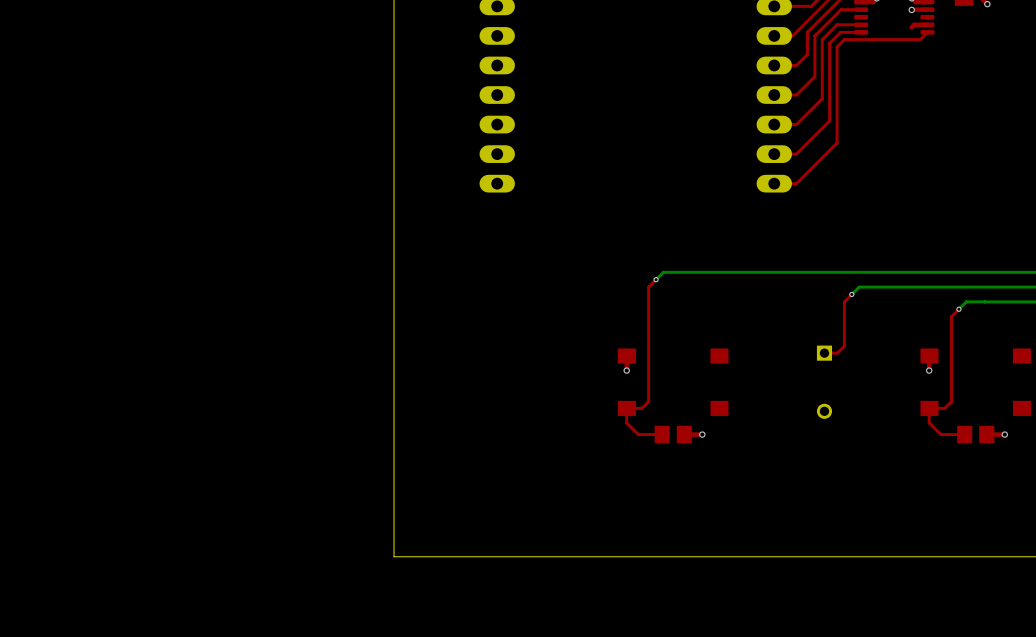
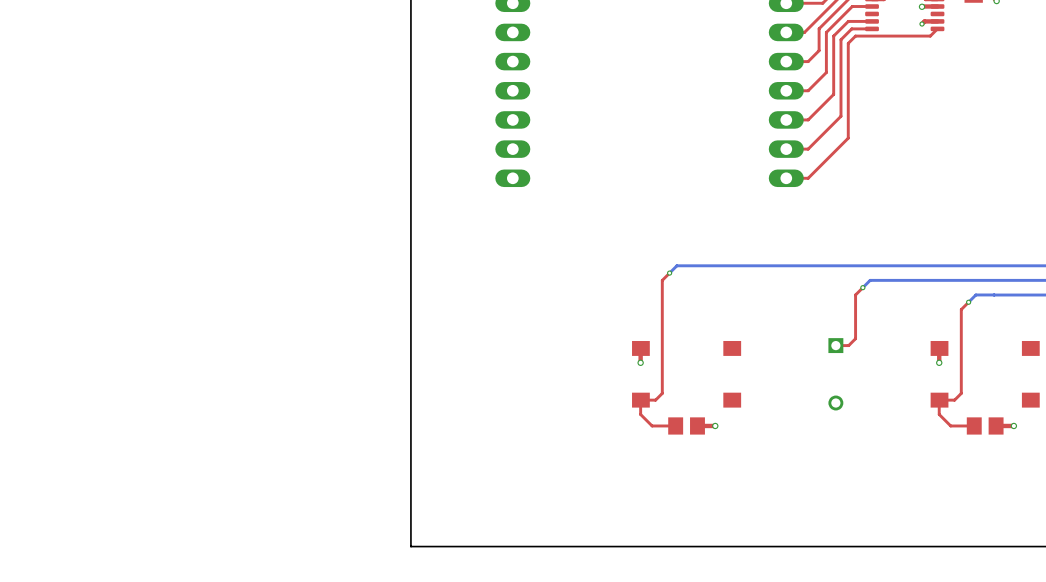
via: none -> (922, 24)

